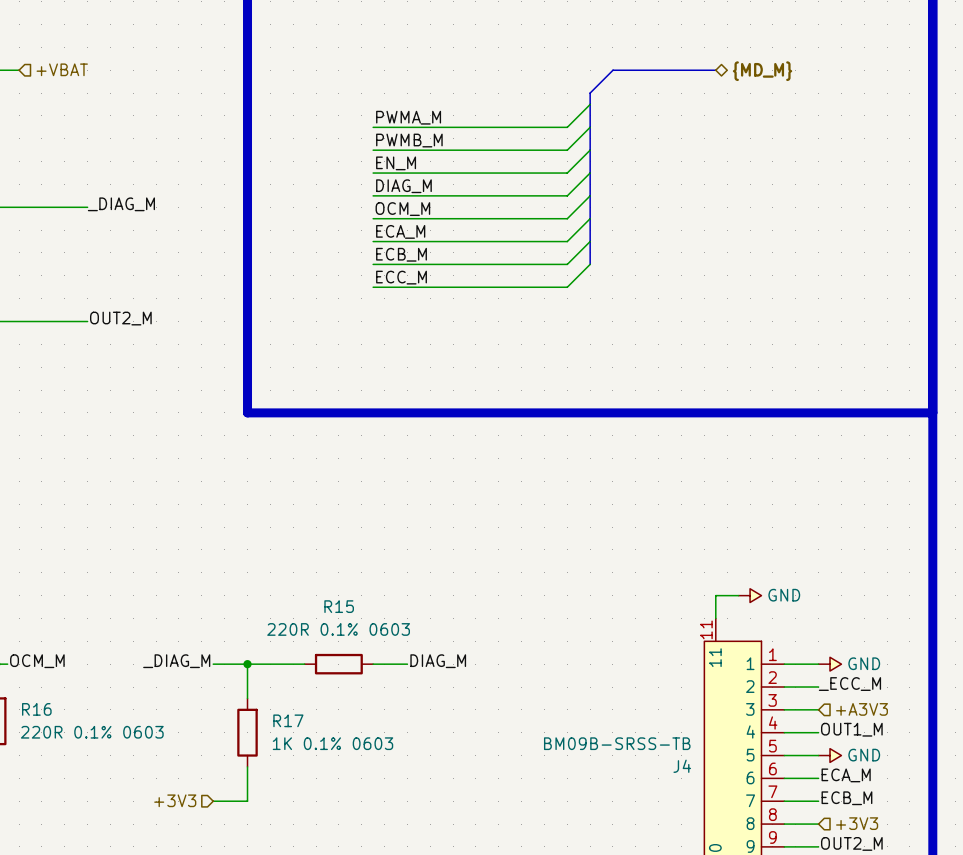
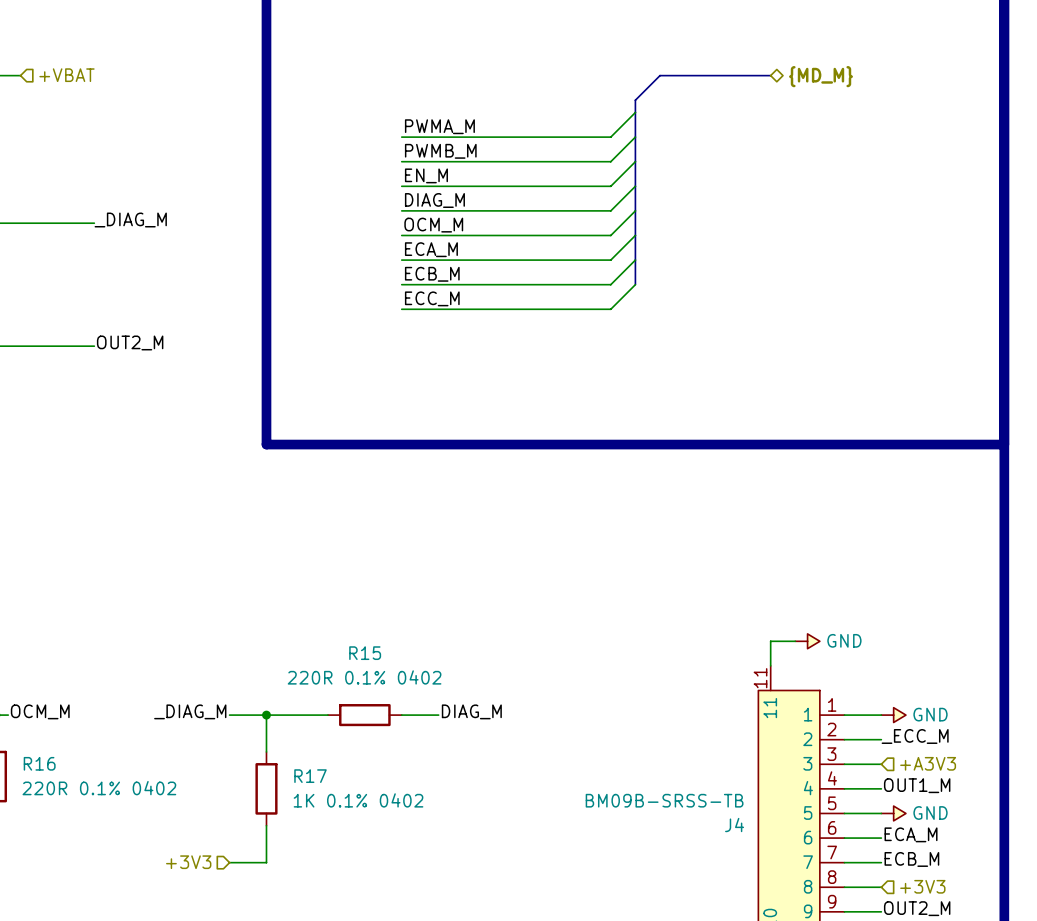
R15 value: 220R 0.1% 0603 (338, 629) -> 220R 0.1% 0402 (364, 677)
R16 value: 220R 0.1% 0603 (92, 732) -> 220R 0.1% 0402 (99, 788)
R17 value: 1K 0.1% 0603 (332, 743) -> 1K 0.1% 0402 (358, 800)

